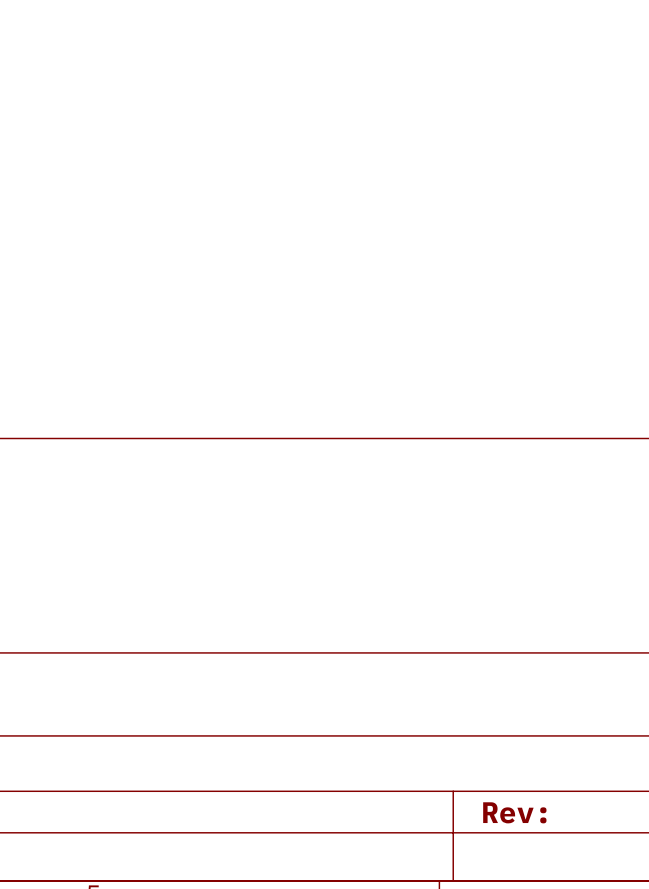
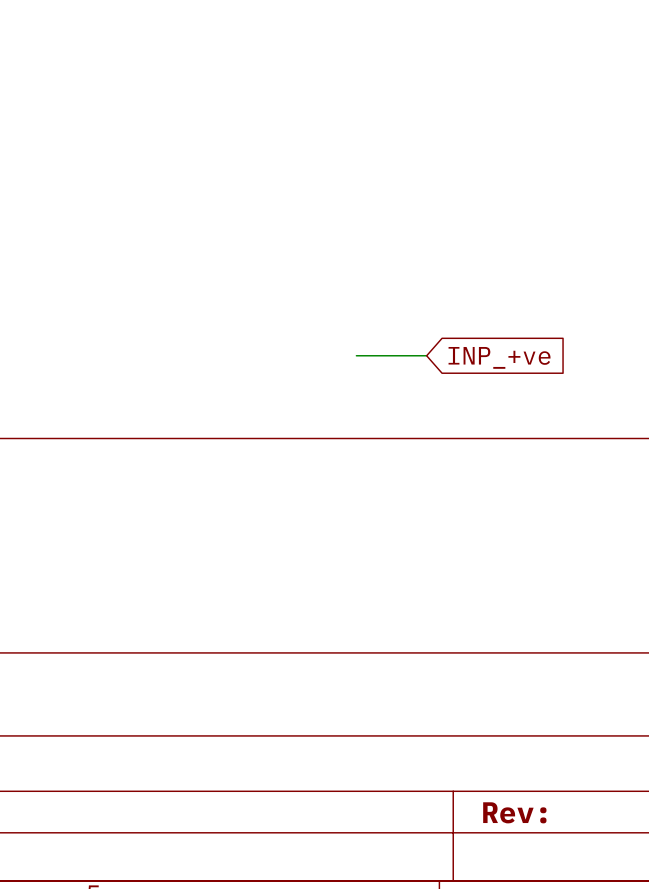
wire: none -> (356, 355) (426, 355)
global label: none -> INP_+ve (499, 357)

